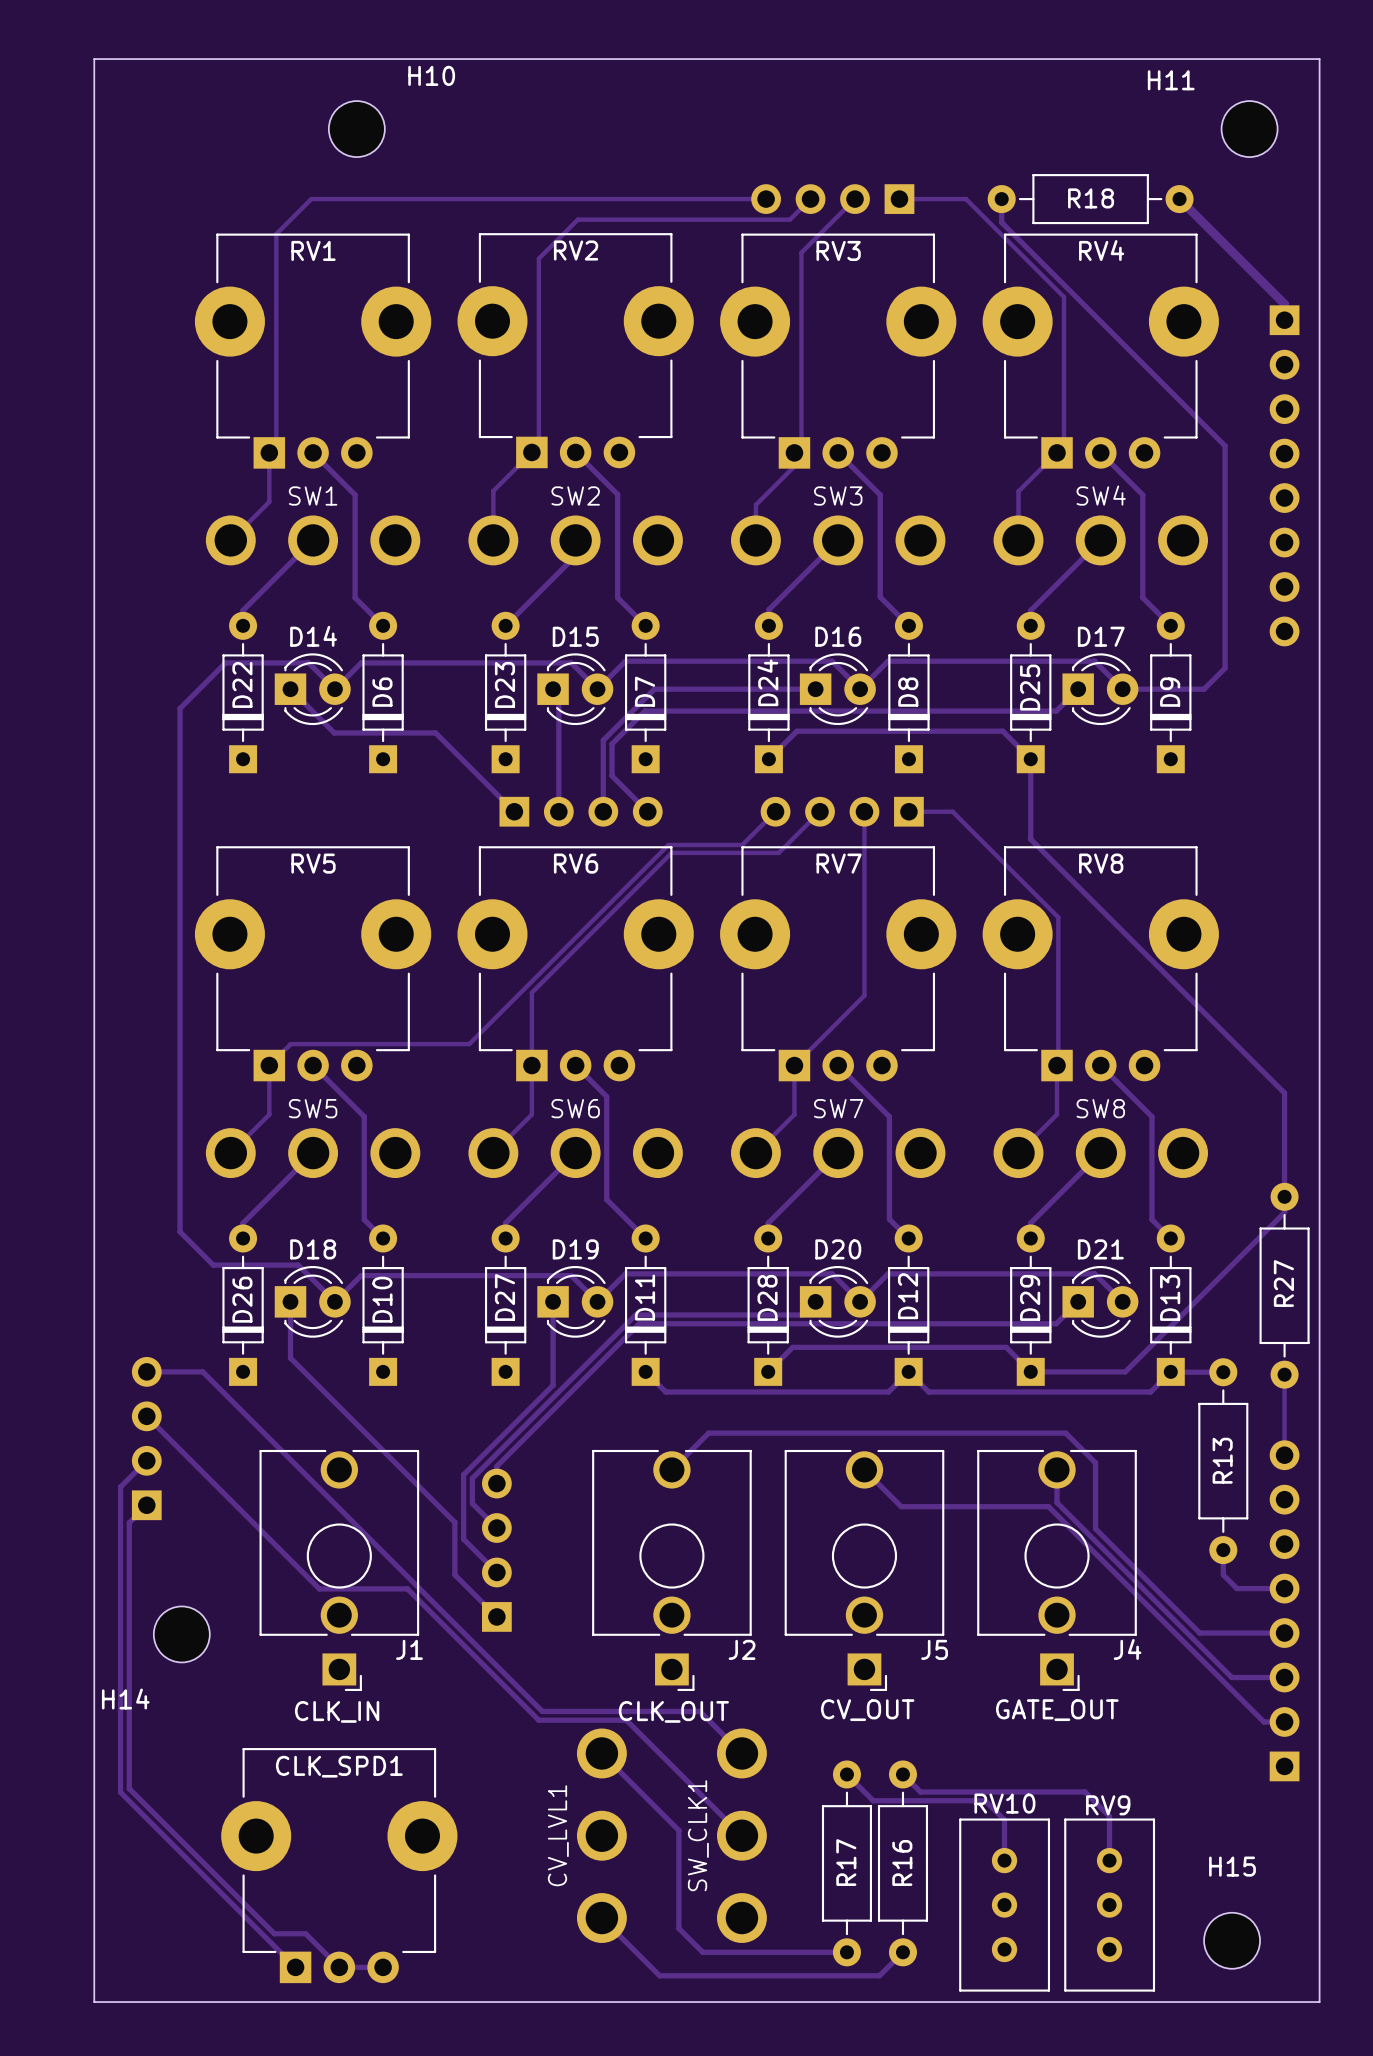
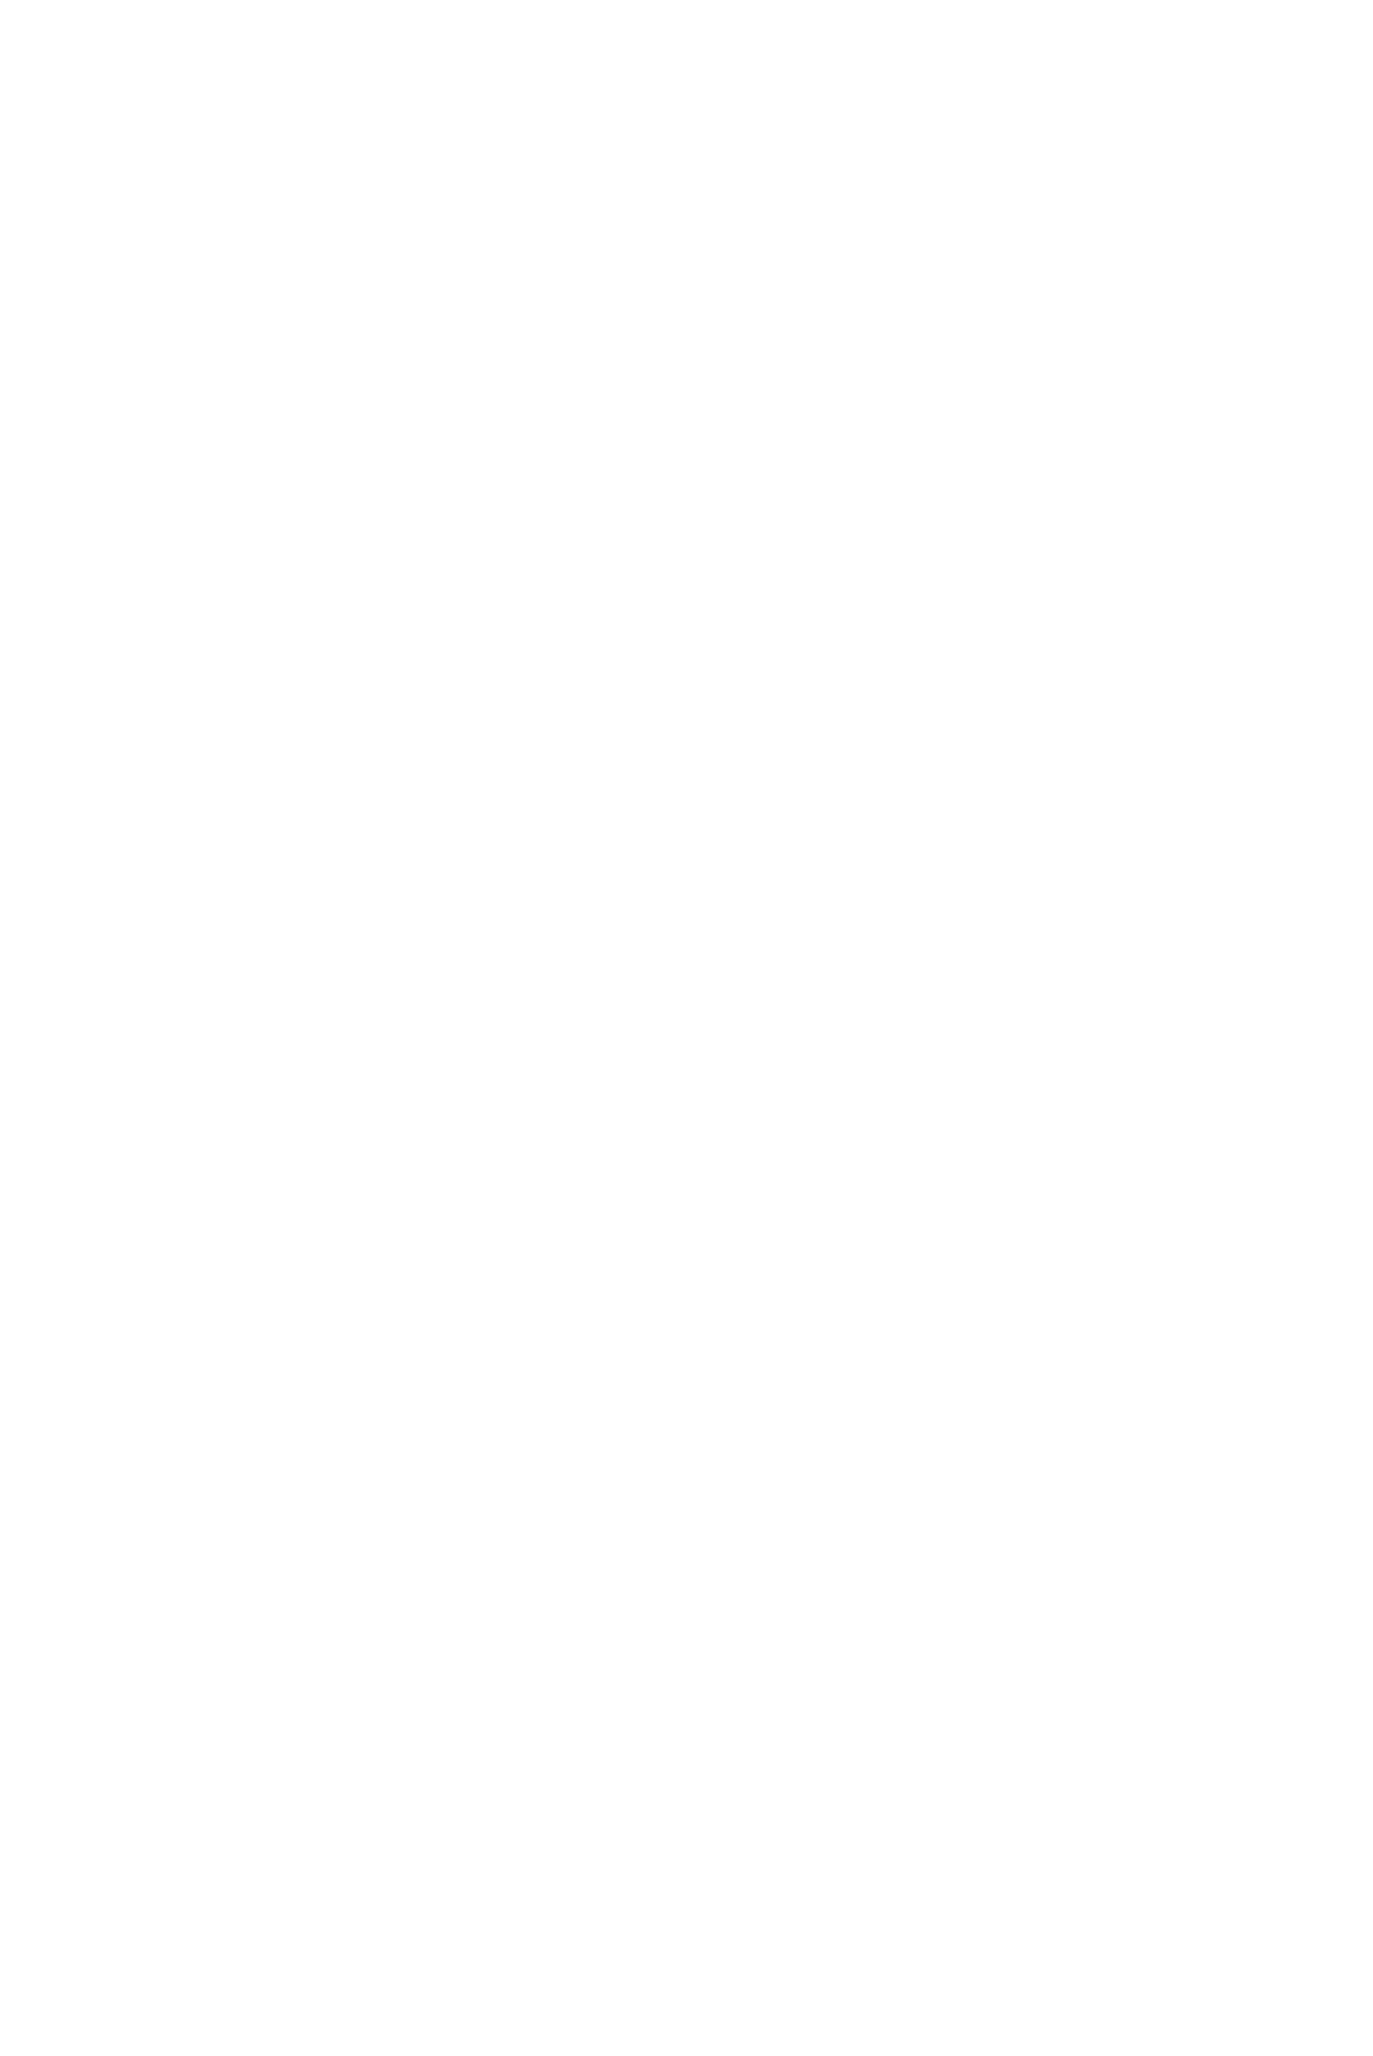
board edge: (94, 59) (1319, 59) (1319, 2002) (94, 2002) (94, 59) -> none
H10: (356, 129) -> none
H11: (1249, 129) -> none
track: (766, 199) (311, 199) (276, 234) (276, 445) (269, 452) (269, 501) (230, 540) -> none
track: (810, 199) (789, 219) (577, 219) (538, 258) (538, 445) (493, 490) (493, 540) -> none
part: (832, 199) -> none
track: (855, 199) (801, 252) (801, 445) (794, 452) (794, 466) (755, 504) (755, 540) -> none
track: (899, 199) (966, 199) (1064, 297) (1064, 445) (1018, 491) (1018, 540) -> none
track: (1001, 199) (1001, 222) (1225, 445) (1225, 668) (1204, 689) (1122, 689) (1094, 661) (888, 661) (860, 689) (832, 661) (625, 661) (597, 689) (571, 662) (361, 662) (334, 689) (308, 662) (225, 662) (180, 708) (180, 1231) (213, 1265) (298, 1265) (334, 1301) (361, 1275) (571, 1275) (597, 1301) (625, 1273) (832, 1273) (860, 1301) (888, 1273) (1094, 1273) (1122, 1301) -> none
R18: (1090, 199) -> none
track: (1179, 199) (1284, 304) (1284, 320) -> none
RV2: (575, 350) -> none
RV1: (313, 351) -> none
RV3: (838, 351) -> none
RV4: (1100, 351) -> none
track: (313, 452) (355, 494) (355, 597) (383, 625) -> none
track: (575, 452) (617, 494) (617, 597) (645, 625) -> none
track: (838, 452) (880, 494) (880, 597) (908, 625) -> none
track: (1100, 452) (1142, 494) (1142, 597) (1170, 625) -> none
part: (1284, 475) -> none
track: (313, 540) (243, 610) (243, 625) -> none
SW1: (313, 540) -> none
track: (575, 540) (575, 555) (505, 625) -> none
SW2: (575, 540) -> none
track: (838, 540) (768, 609) (768, 625) -> none
SW3: (838, 540) -> none
track: (1100, 540) (1030, 610) (1030, 625) -> none
SW4: (1100, 540) -> none
track: (290, 689) (334, 732) (435, 732) (514, 811) -> none
D14: (312, 689) -> none
track: (553, 689) (558, 694) (558, 811) -> none
D15: (575, 689) -> none
track: (815, 689) (654, 689) (603, 740) (603, 811) -> none
D16: (837, 689) -> none
track: (1078, 689) (1056, 711) (644, 711) (612, 743) (612, 776) (647, 811) -> none
D17: (1100, 689) -> none
D22: (243, 692) -> none
D6: (383, 692) -> none
D23: (505, 692) -> none
D7: (645, 692) -> none
D24: (768, 692) -> none
D8: (908, 692) -> none
D25: (1030, 692) -> none
D9: (1170, 692) -> none
track: (768, 759) (796, 731) (1002, 731) (1030, 759) (1030, 839) (1284, 1093) (1284, 1212) (1125, 1371) (1030, 1371) (1006, 1347) (792, 1347) (768, 1371) -> none
part: (581, 811) -> none
track: (775, 811) (742, 844) (668, 844) (469, 1044) (290, 1044) (269, 1065) (269, 1114) (230, 1153) -> none
track: (820, 811) (778, 852) (671, 852) (531, 992) (531, 1114) (493, 1153) -> none
part: (842, 811) -> none
track: (864, 811) (864, 995) (794, 1065) (794, 1114) (755, 1153) -> none
track: (908, 811) (952, 811) (1058, 917) (1057, 1114) (1018, 1153) -> none
RV5: (313, 963) -> none
RV6: (575, 963) -> none
RV7: (838, 963) -> none
RV8: (1100, 963) -> none
track: (313, 1065) (364, 1116) (364, 1219) (383, 1238) -> none
track: (575, 1065) (606, 1096) (606, 1199) (645, 1238) -> none
track: (838, 1065) (889, 1116) (889, 1219) (908, 1238) -> none
track: (1100, 1065) (1151, 1116) (1151, 1219) (1170, 1238) -> none
track: (313, 1153) (243, 1223) (243, 1238) -> none
SW5: (313, 1153) -> none
track: (575, 1153) (505, 1223) (505, 1238) -> none
SW6: (575, 1153) -> none
track: (838, 1153) (768, 1223) (768, 1238) -> none
SW7: (838, 1153) -> none
track: (1100, 1153) (1030, 1223) (1030, 1238) -> none
SW8: (1100, 1153) -> none
R27: (1284, 1285) -> none
track: (290, 1301) (290, 1358) (454, 1522) (454, 1574) (496, 1616) -> none
D18: (312, 1301) -> none
track: (553, 1301) (553, 1385) (463, 1474) (463, 1539) (496, 1572) -> none
D19: (575, 1301) -> none
track: (815, 1301) (802, 1314) (635, 1314) (472, 1478) (472, 1503) (496, 1528) -> none
D20: (837, 1301) -> none
track: (1078, 1301) (1056, 1323) (639, 1323) (496, 1466) (496, 1483) -> none
D21: (1100, 1301) -> none
D26: (243, 1305) -> none
D10: (383, 1305) -> none
D27: (505, 1305) -> none
D11: (645, 1305) -> none
D28: (768, 1305) -> none
D12: (908, 1305) -> none
D29: (1030, 1305) -> none
D13: (1170, 1305) -> none
track: (146, 1371) (202, 1371) (542, 1711) (699, 1711) (741, 1753) -> none
track: (645, 1371) (665, 1392) (888, 1392) (908, 1371) (928, 1392) (1150, 1392) (1170, 1371) (1223, 1372) -> none
track: (1284, 1374) (1284, 1455) -> none
track: (146, 1416) (319, 1588) (407, 1588) (538, 1720) (626, 1720) (741, 1835) -> none
part: (146, 1438) -> none
track: (146, 1460) (120, 1487) (120, 1792) (295, 1967) -> none
R13: (1223, 1461) -> none
track: (671, 1469) (708, 1433) (1065, 1433) (1095, 1462) (1095, 1528) (1199, 1633) (1284, 1633) -> none
track: (864, 1469) (901, 1506) (1048, 1506) (1263, 1721) (1284, 1721) -> none
track: (1057, 1469) (1057, 1502) (1231, 1677) (1284, 1677) -> none
track: (146, 1505) (129, 1522) (129, 1788) (274, 1933) (305, 1933) (339, 1967) (383, 1967) -> none
part: (496, 1550) -> none
track: (1223, 1550) (1223, 1574) (1236, 1588) (1284, 1588) -> none
J1: (339, 1570) -> none
J2: (671, 1570) -> none
J5: (864, 1570) -> none
J4: (1057, 1570) -> none
part: (1284, 1610) -> none
H14: (181, 1634) -> none
text: CV_OUT (867, 1710) -> none
text: GATE_OUT (1057, 1710) -> none
text: CLK_IN (337, 1711) -> none
text: CLK_OUT (673, 1711) -> none
track: (601, 1753) (678, 1830) (678, 1928) (702, 1952) (846, 1952) -> none
track: (846, 1774) (873, 1800) (985, 1800) (1004, 1819) (1004, 1860) -> none
track: (902, 1774) (920, 1791) (1085, 1791) (1109, 1816) (1109, 1860) -> none
CV_LVL1: (601, 1835) -> none
SW_CLK1: (741, 1835) -> none
R17: (846, 1863) -> none
R16: (902, 1863) -> none
CLK_SPD1: (339, 1865) -> none
RV10: (1004, 1905) -> none
RV9: (1109, 1905) -> none
track: (601, 1918) (659, 1975) (879, 1975) (902, 1952) -> none
H15: (1232, 1940) -> none

